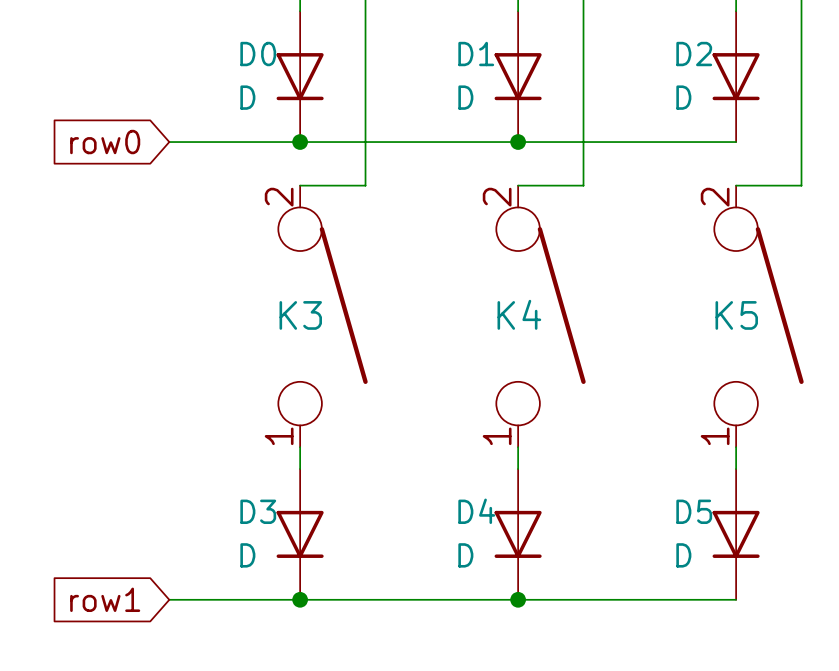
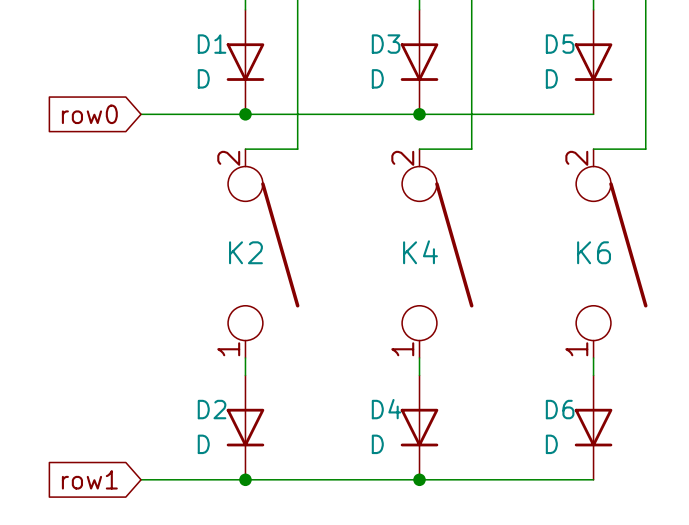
D0 name: D0 (258, 54) -> D1 (212, 44)
D1 name: D1 (476, 54) -> D3 (386, 44)
D2 name: D2 (694, 54) -> D5 (560, 44)
K3 name: K3 (300, 315) -> K2 (245, 252)
K5 name: K5 (736, 315) -> K6 (594, 252)
D3 name: D3 (258, 511) -> D2 (212, 409)
D5 name: D5 (694, 511) -> D6 (560, 409)

